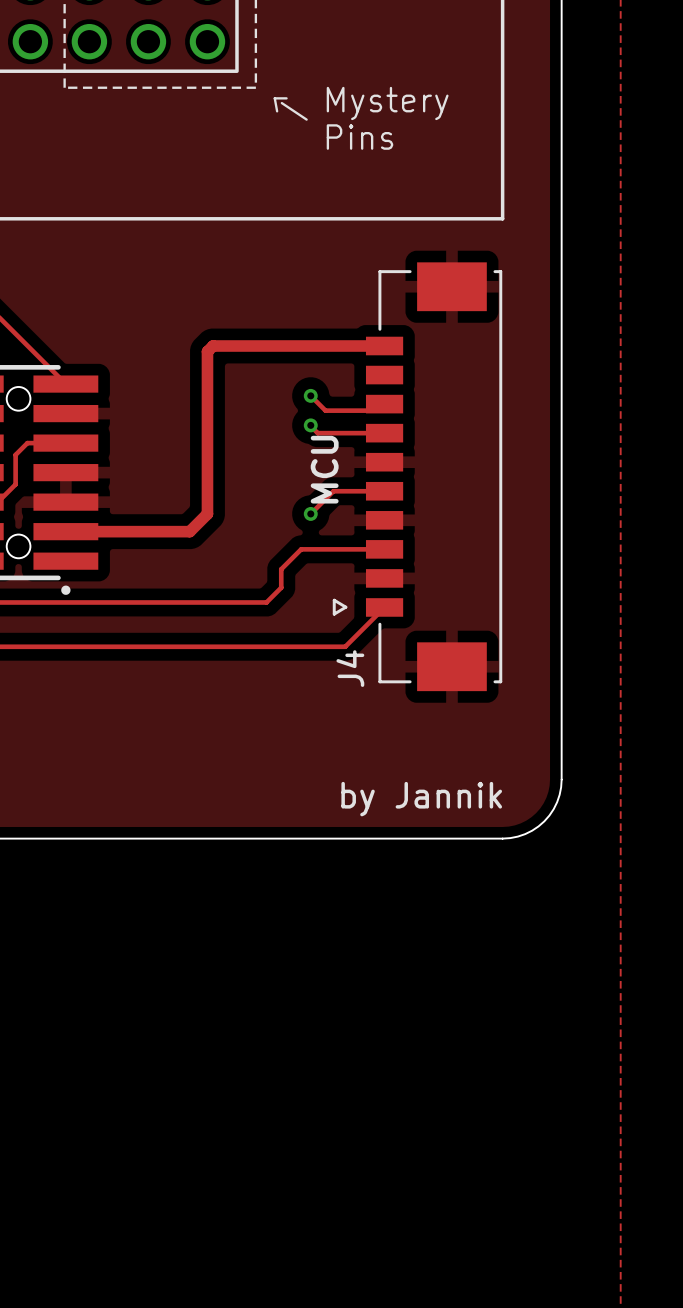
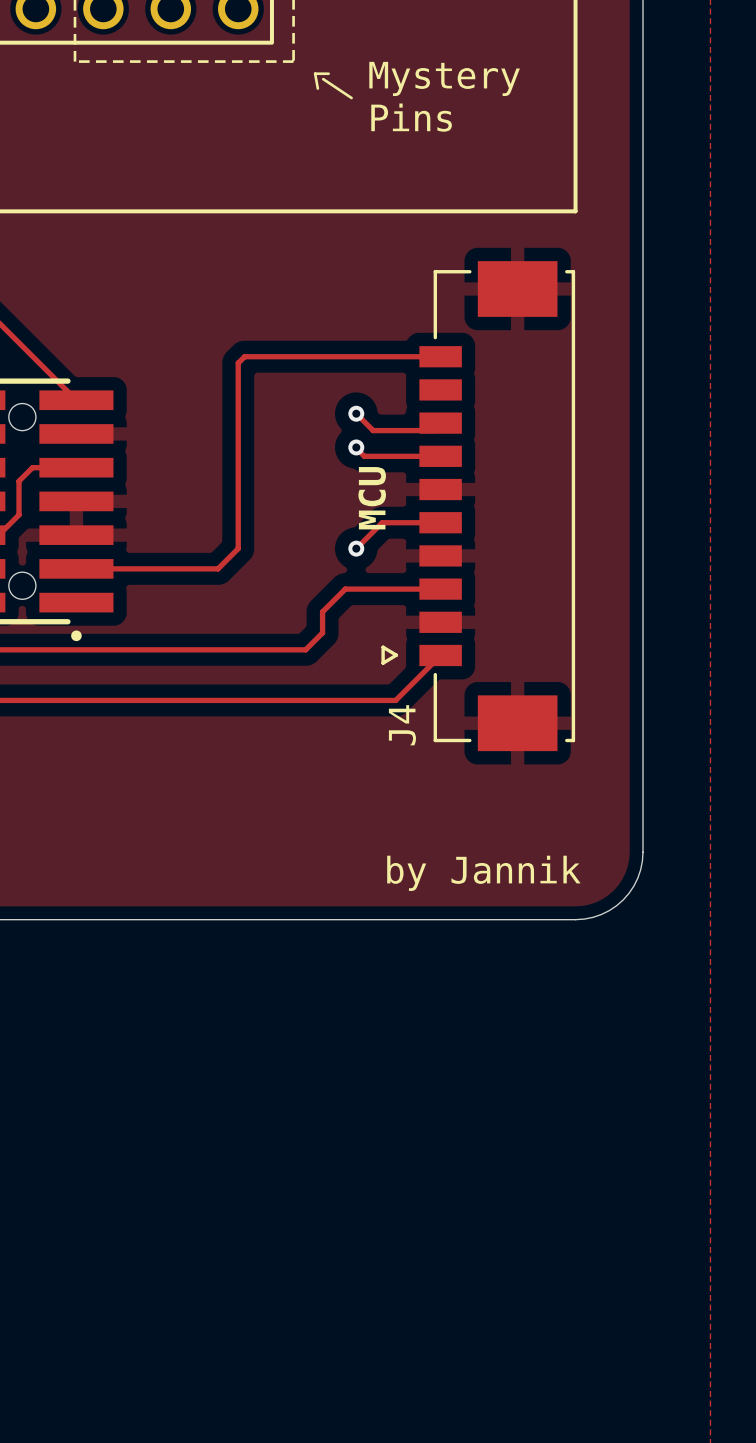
track width: thick (384, 346) (213, 346) (207, 351) (207, 513) (189, 531) (65, 531) -> thin (440, 356) (244, 356) (238, 363) (238, 548) (218, 568) (76, 568)

